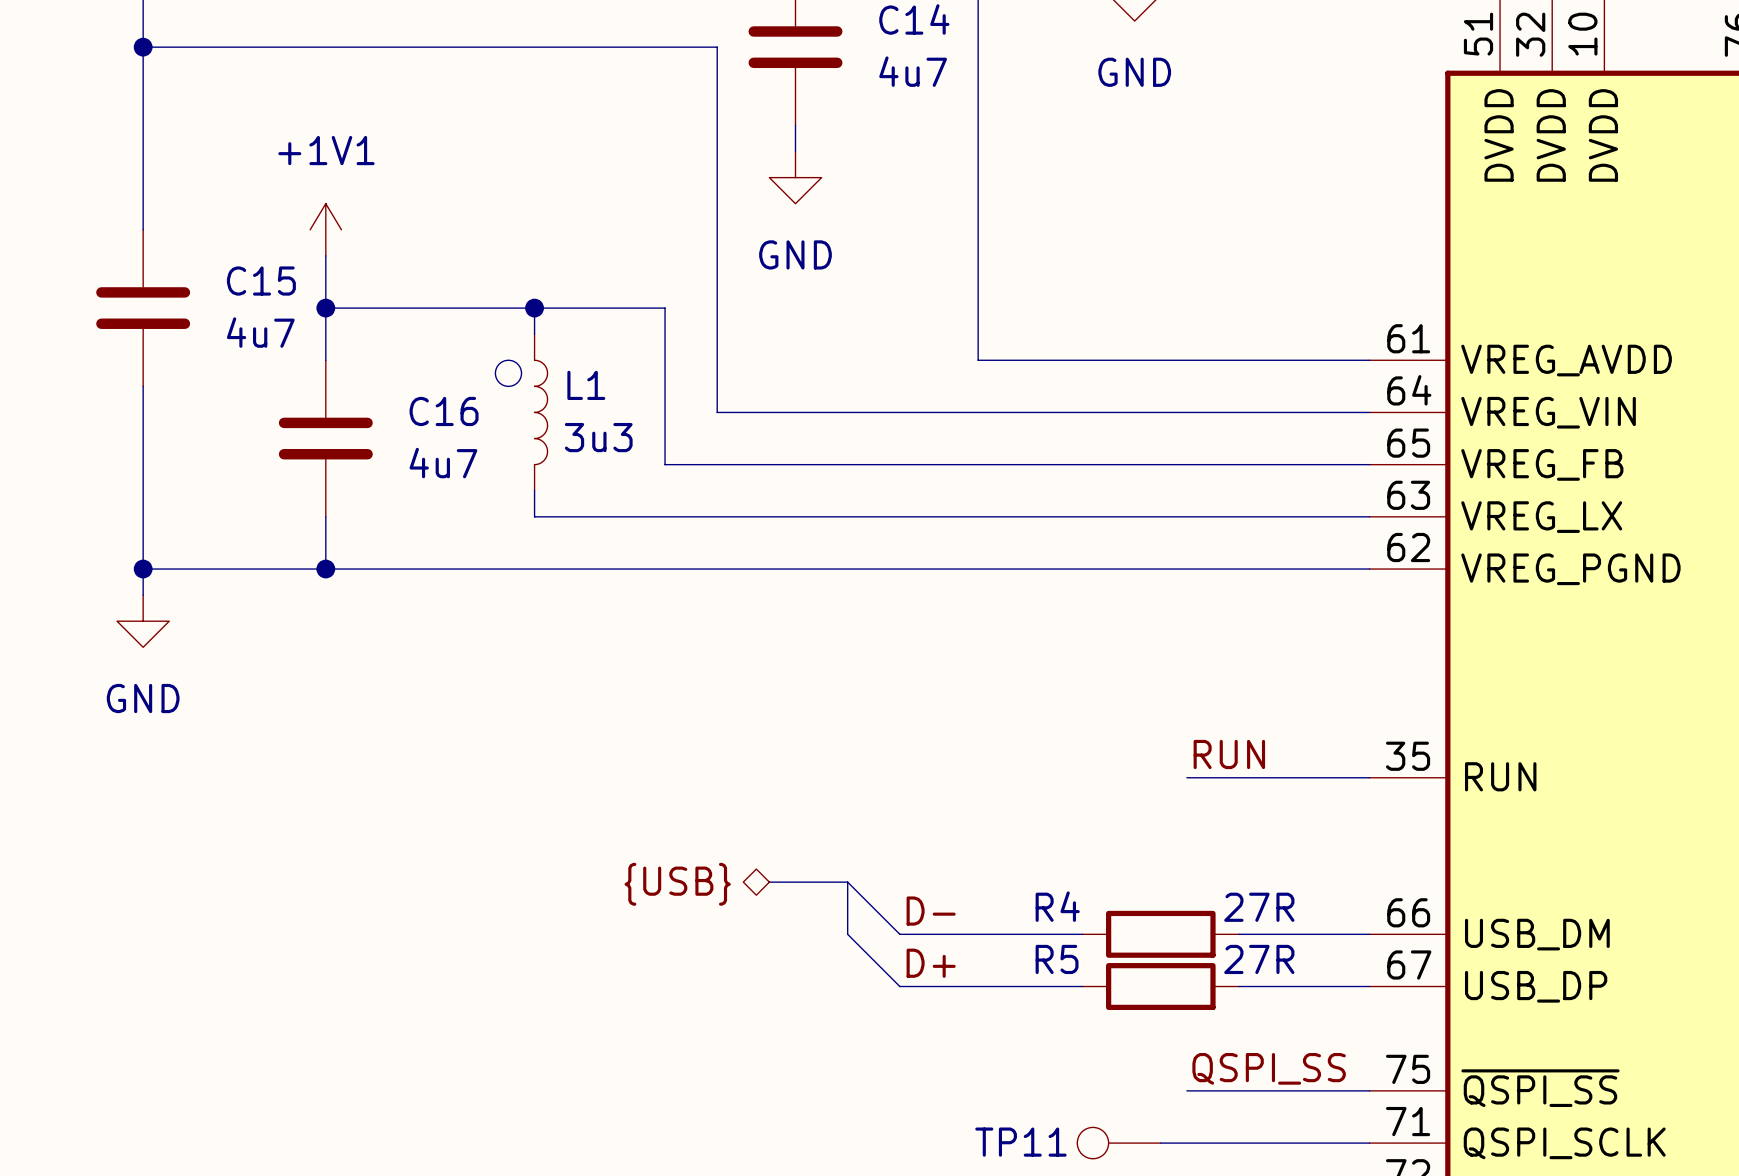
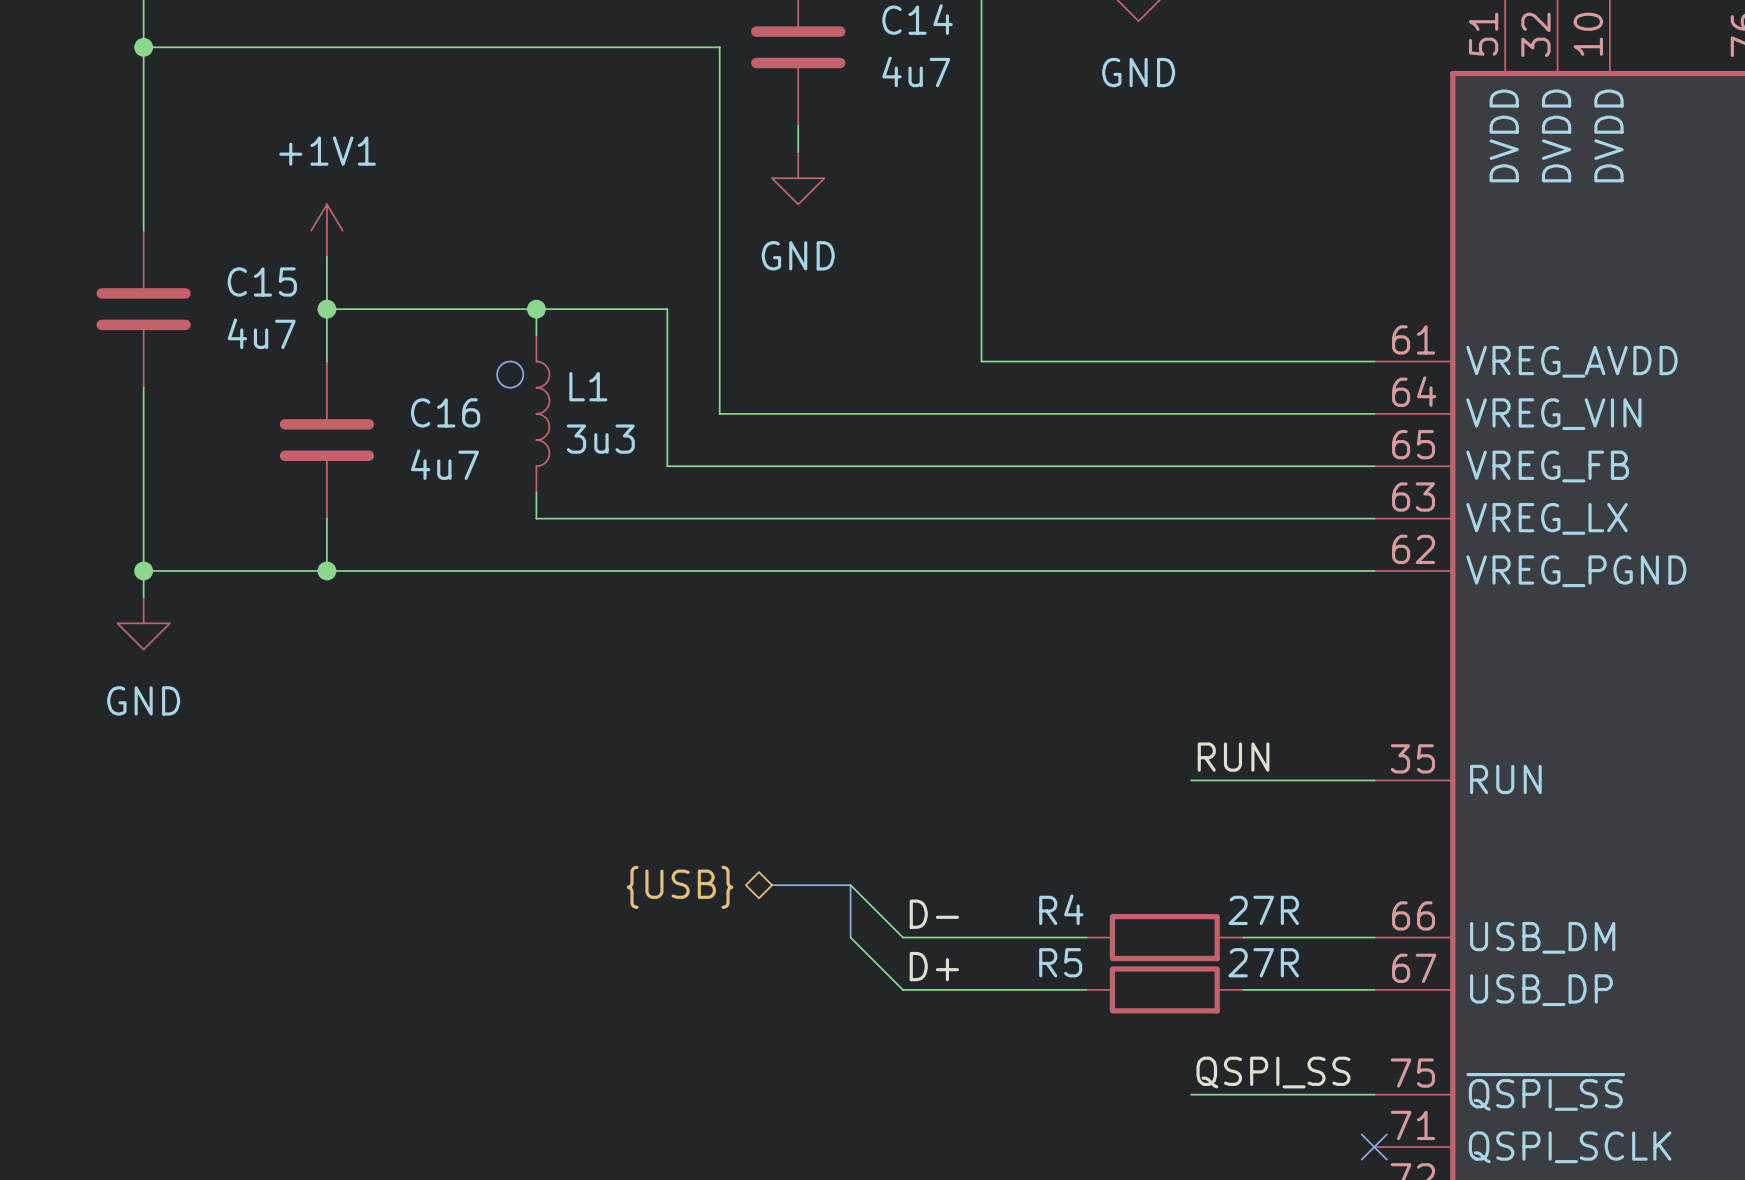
TP11: (1119, 1143) -> none
wire: (1160, 1143) (1369, 1143) -> none
no-connect mark: none -> (1374, 1147)

